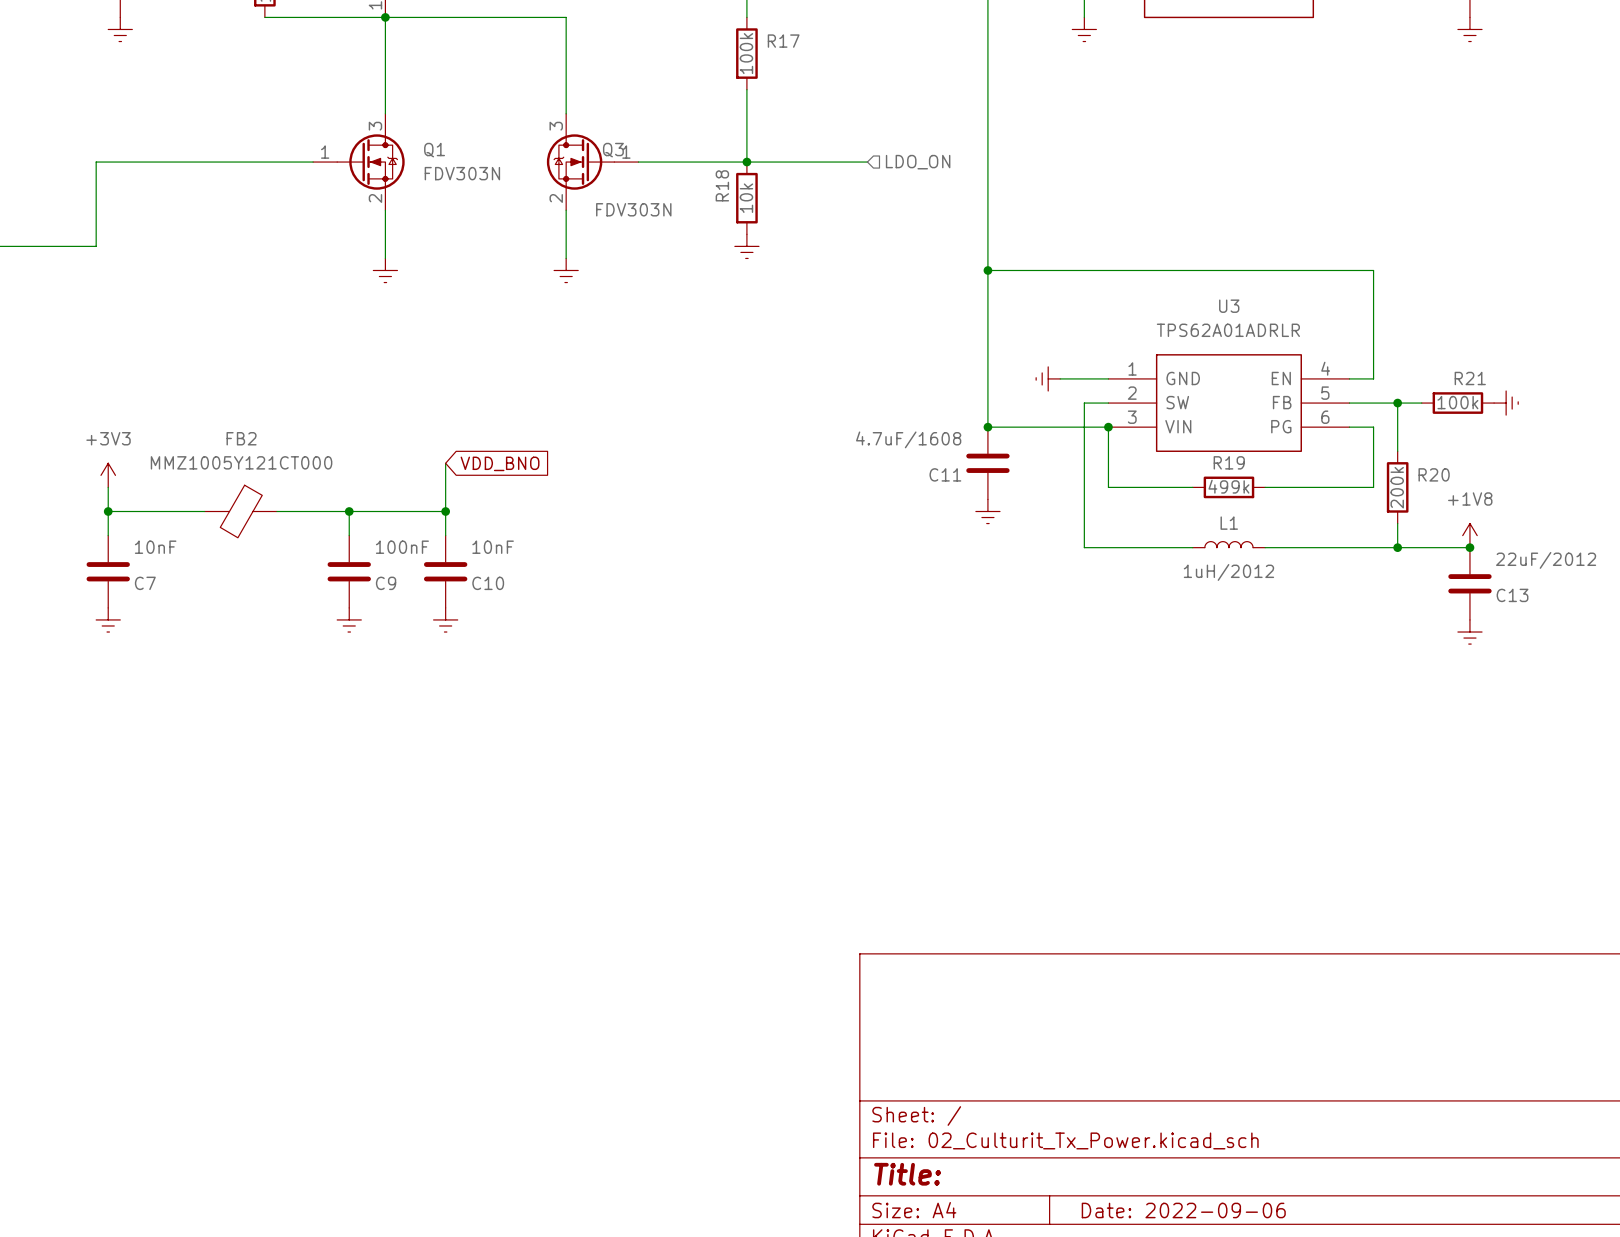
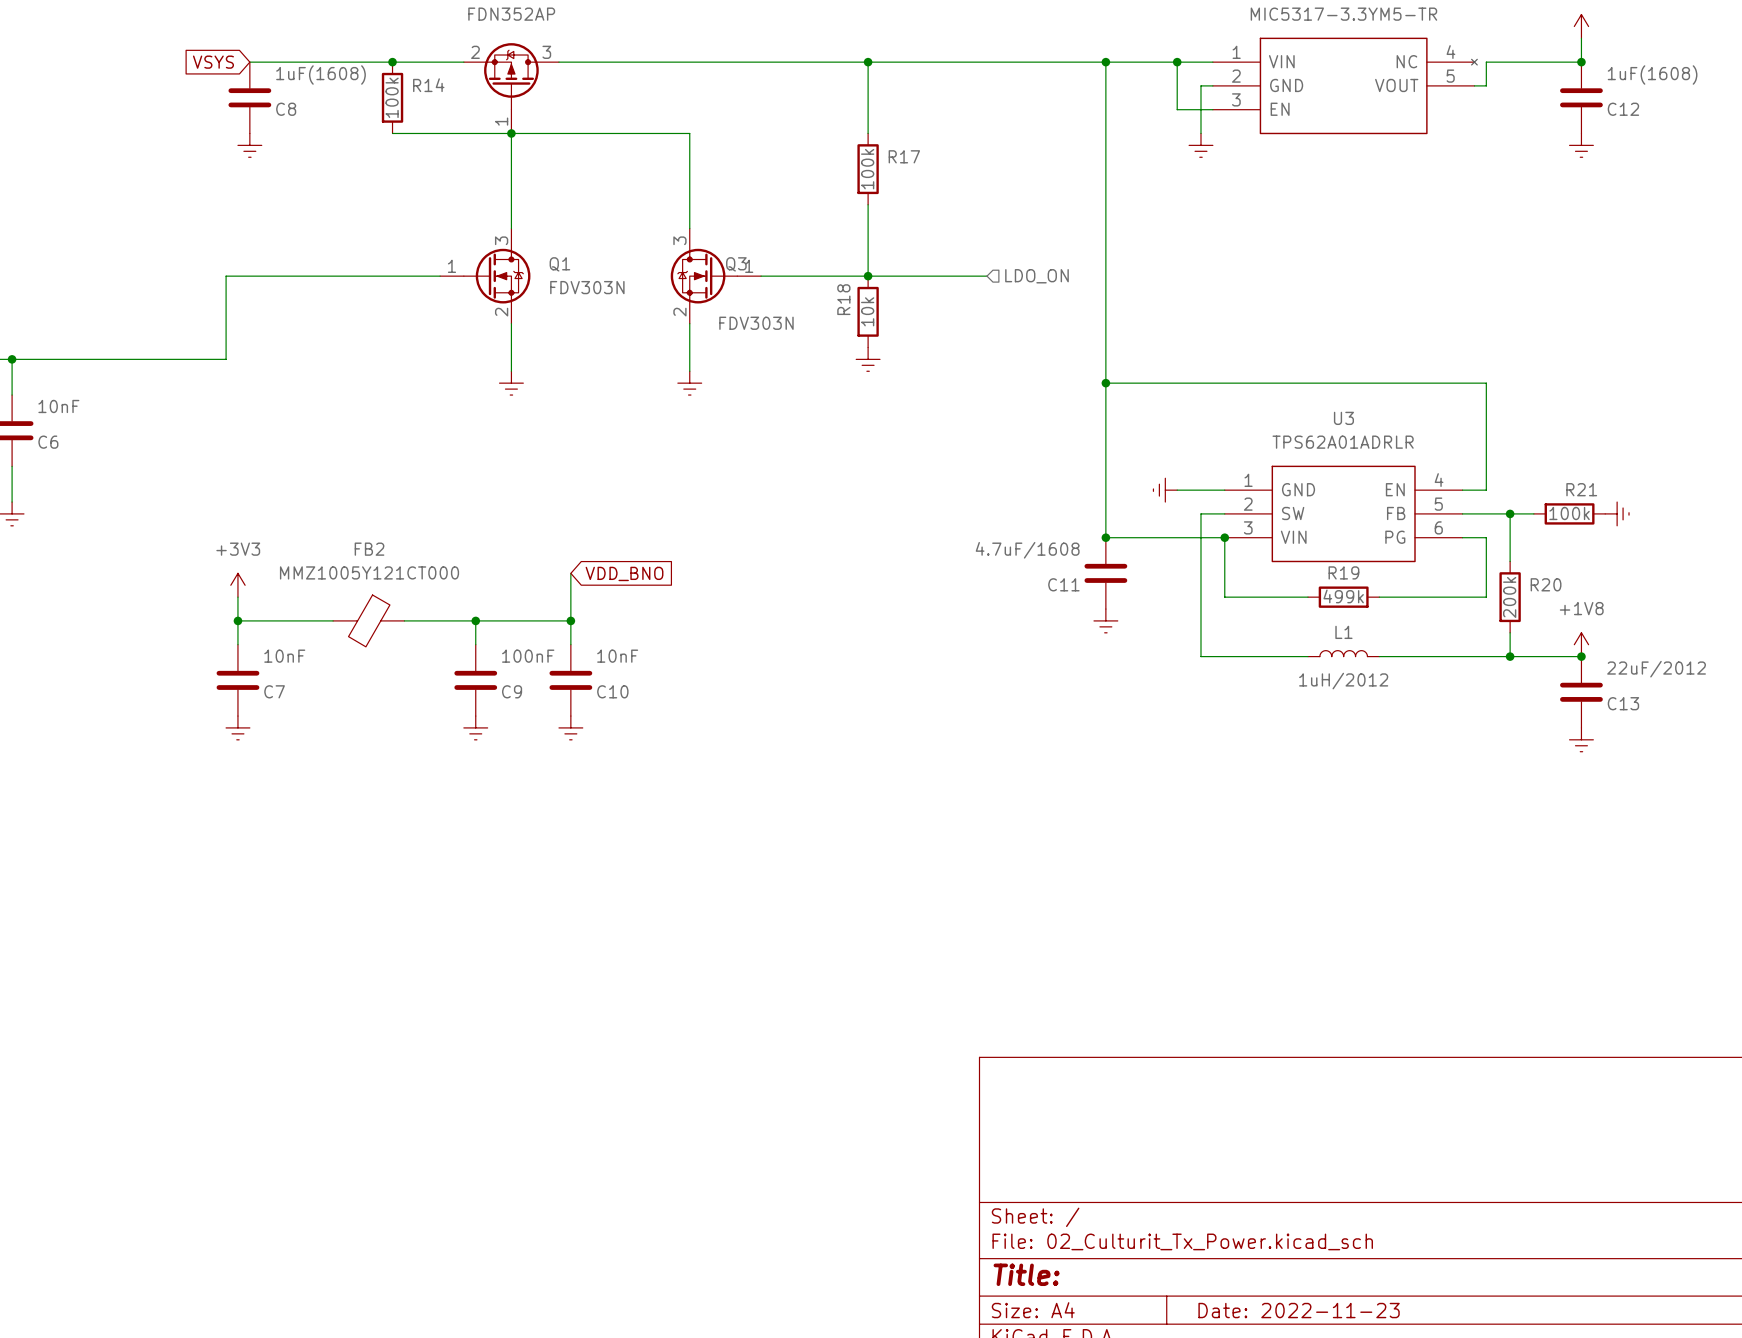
title block: Date: 2022-09-06 (1183, 1210) -> Date: 2022-11-23 (1299, 1310)

